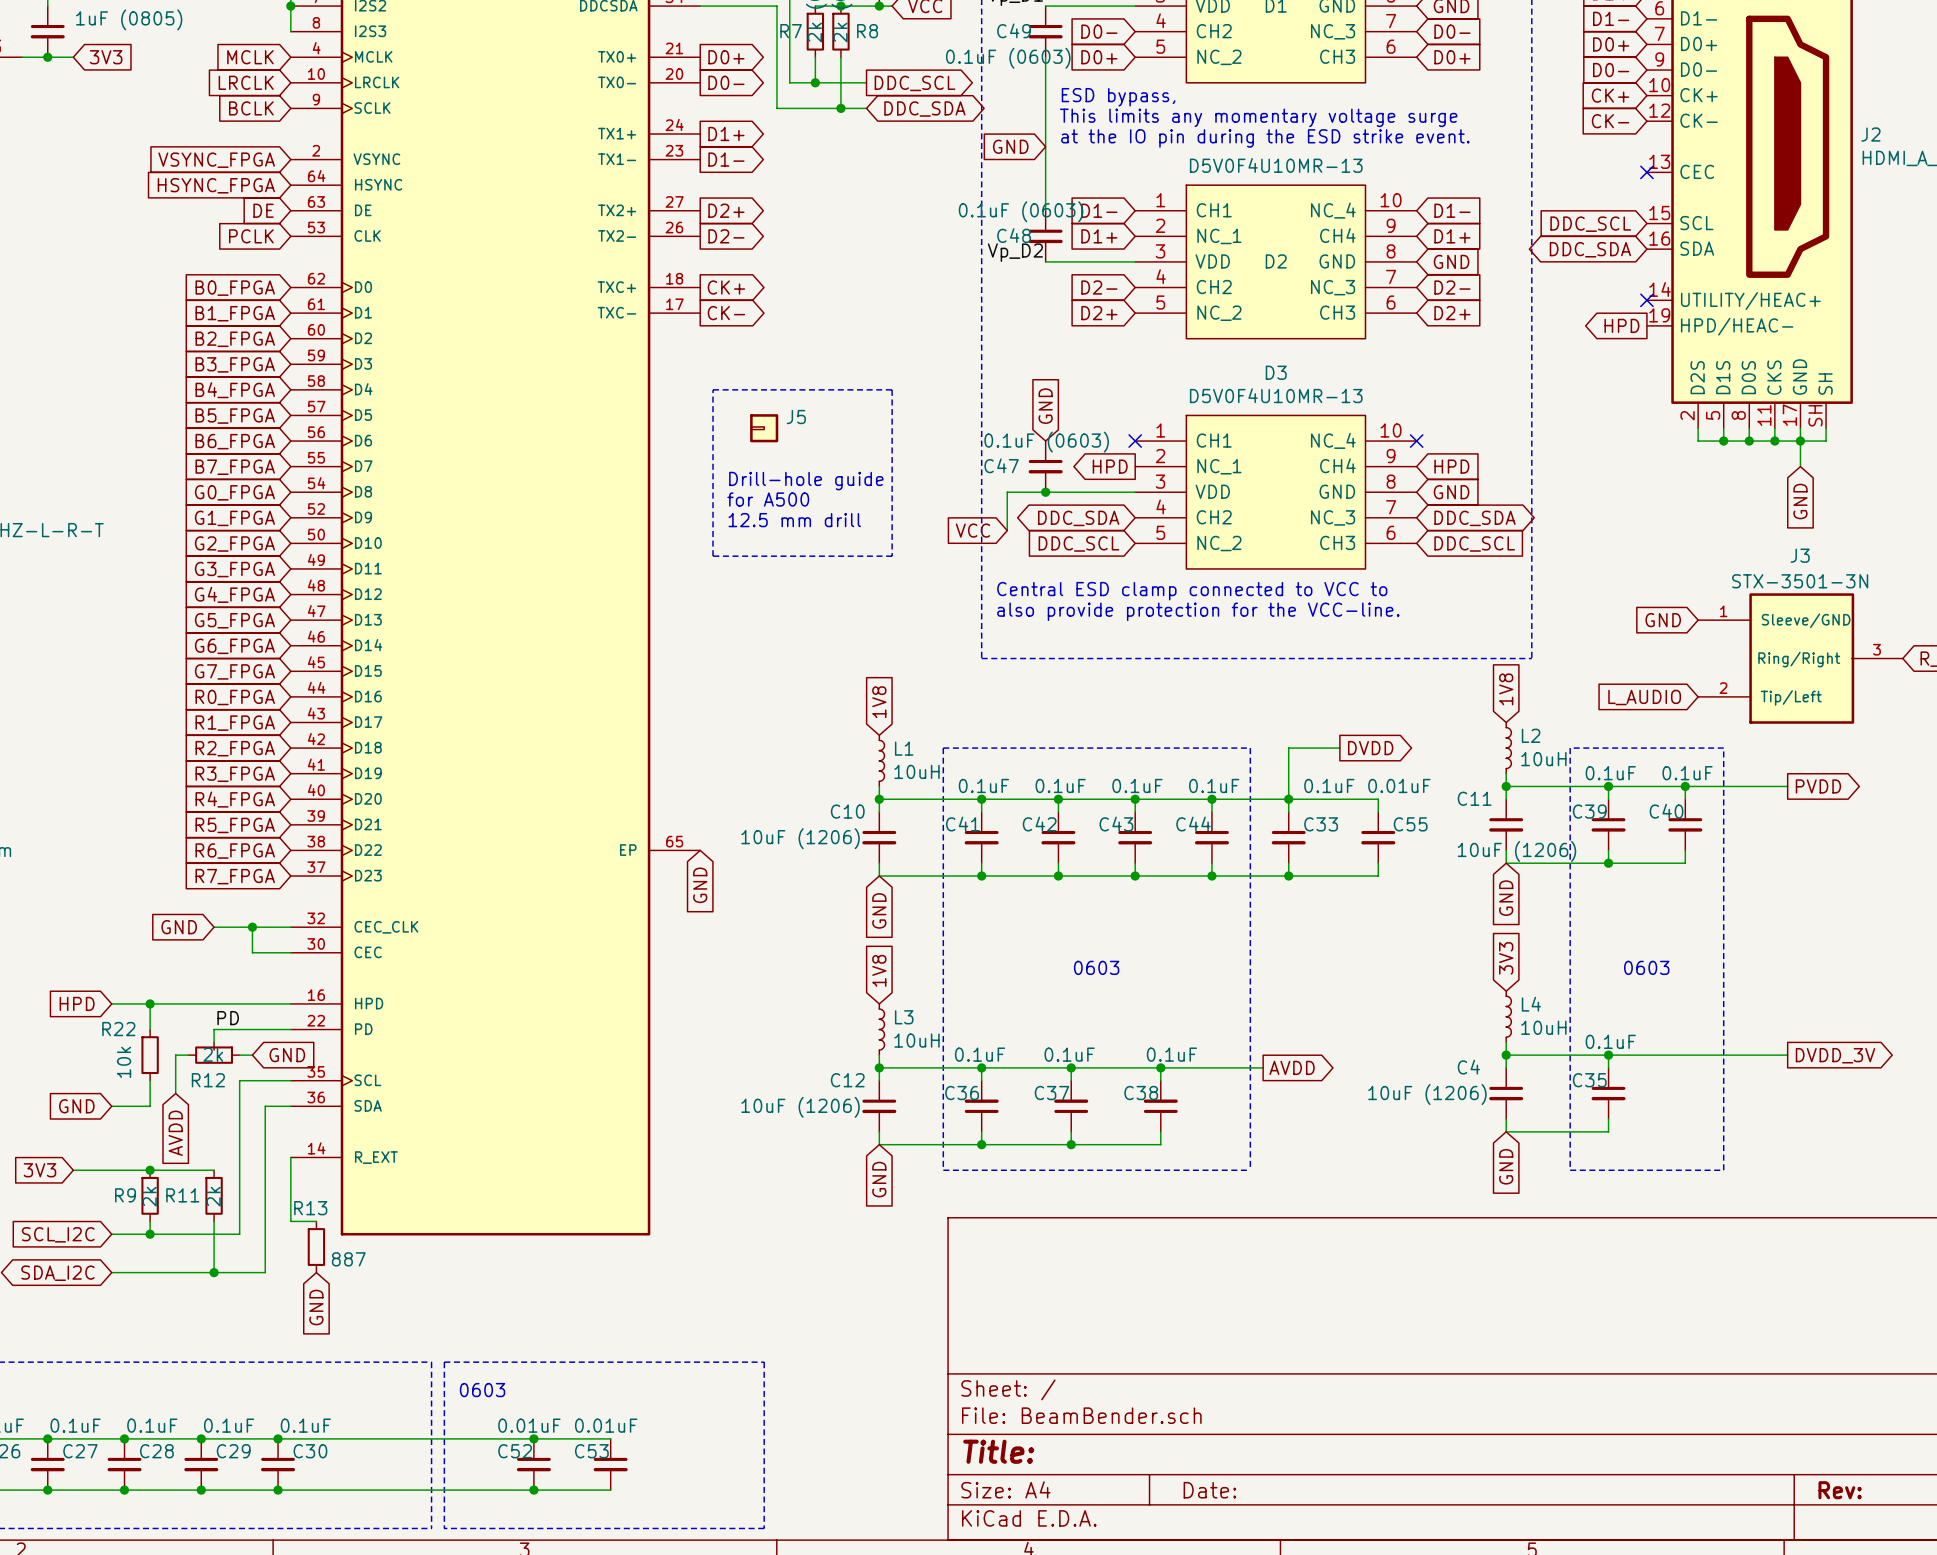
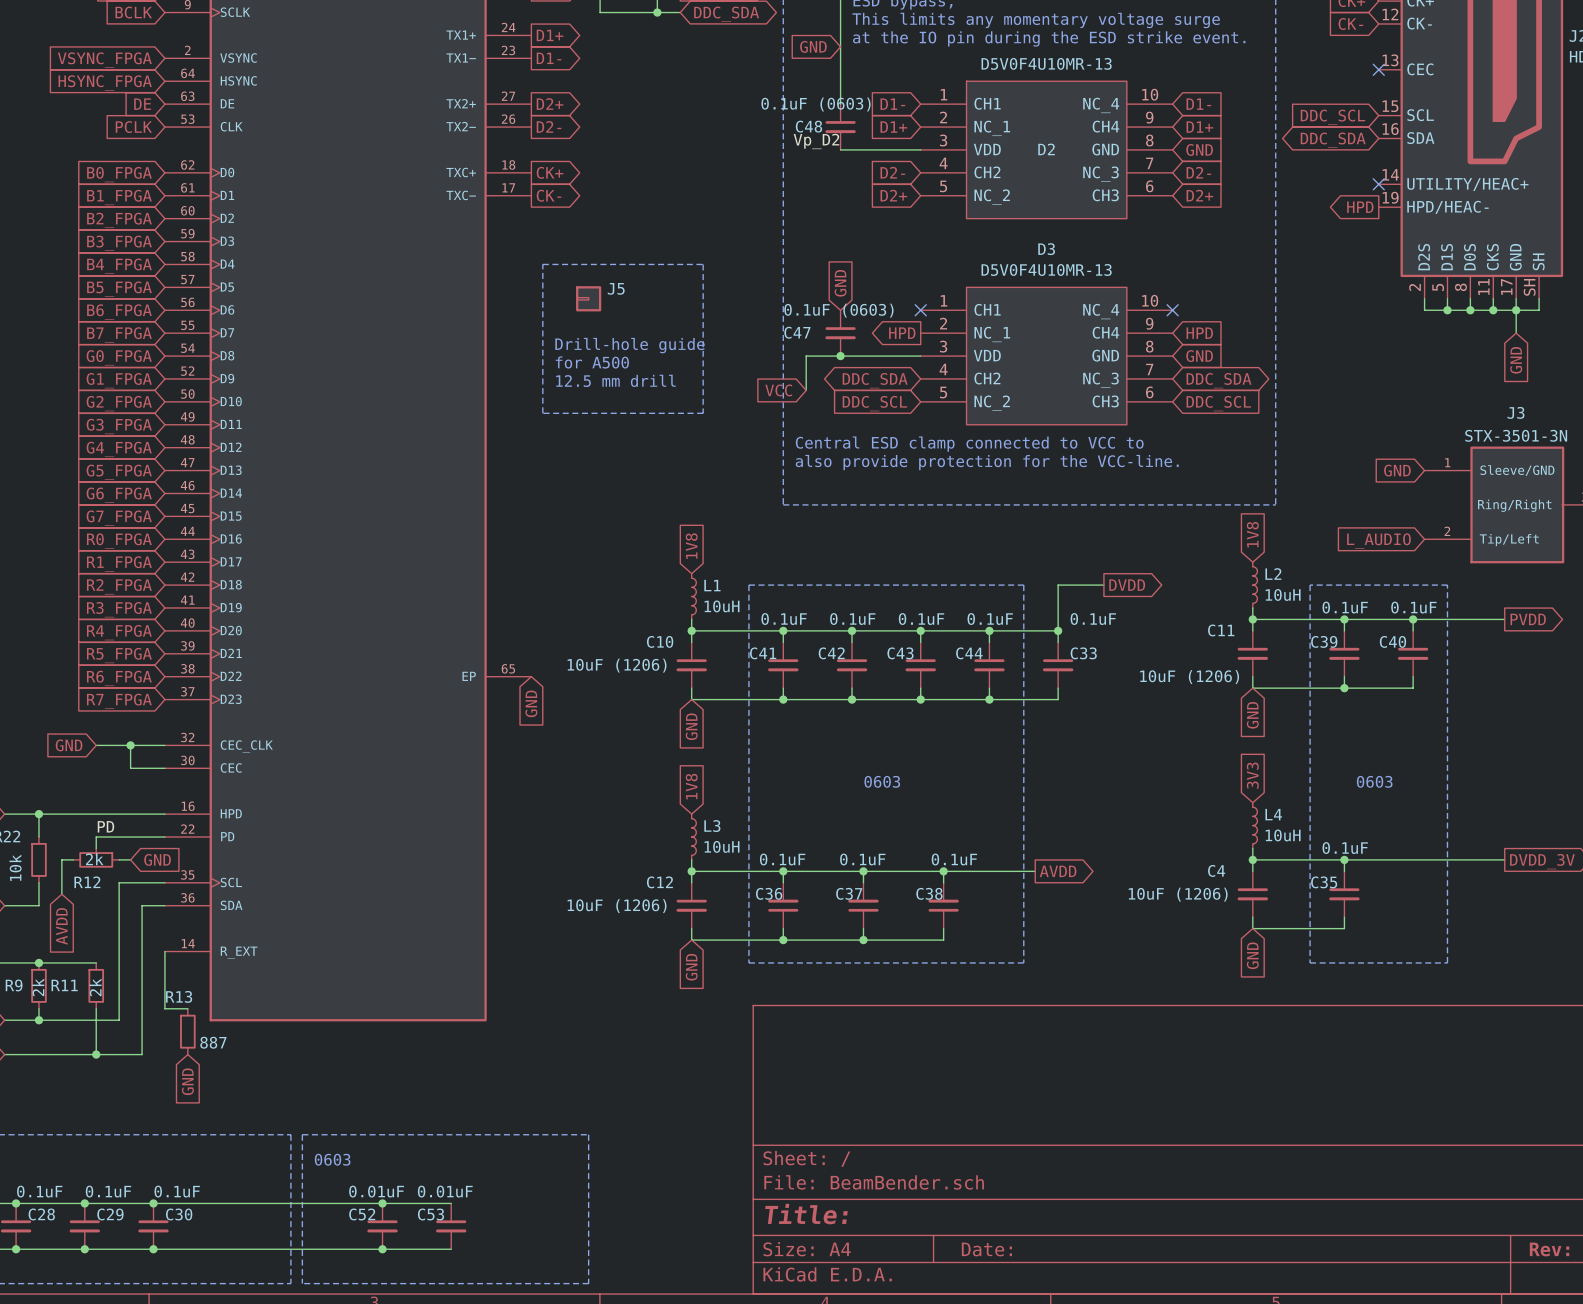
wire: (1288, 799) (1378, 799) (1378, 812) -> none
C55: 0.01uF (1378, 837) -> none
C11 value position: 10uF (1206) (1516, 851) -> 10uF (1206) (1189, 677)
wire: (1378, 863) (1378, 876) (1288, 876) -> none
junction: (1288, 876) -> none

